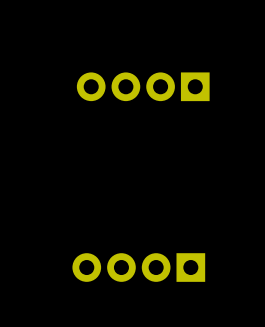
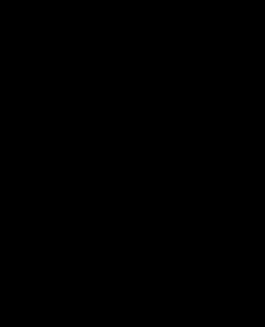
part: (143, 86) -> none
part: (138, 267) -> none

